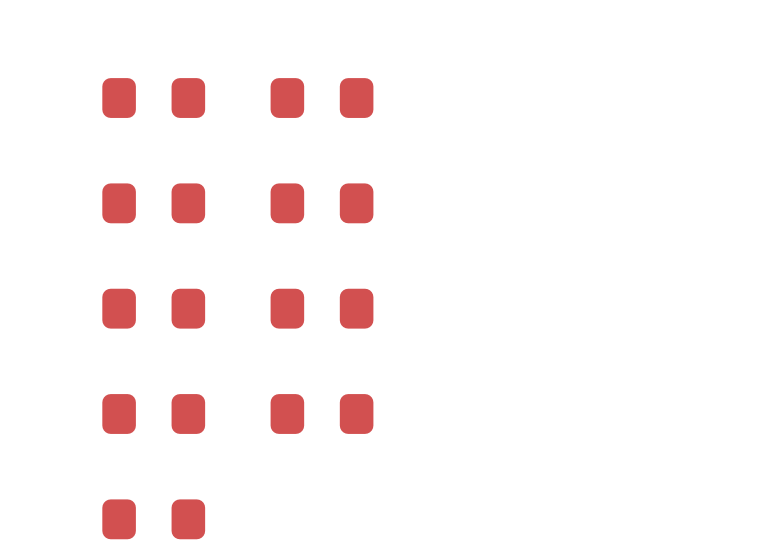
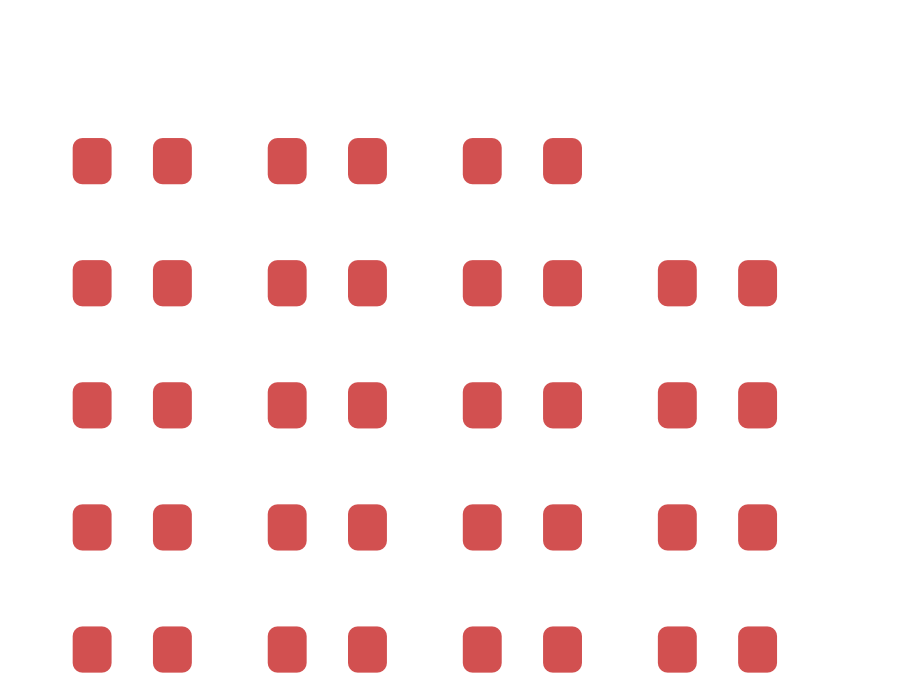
part: none -> (522, 161)
part: none -> (522, 283)
part: none -> (717, 283)
part: none -> (522, 405)
part: none -> (717, 405)
part: none -> (522, 527)
part: none -> (717, 527)
part: none -> (327, 649)
part: none -> (522, 649)
part: none -> (717, 649)

